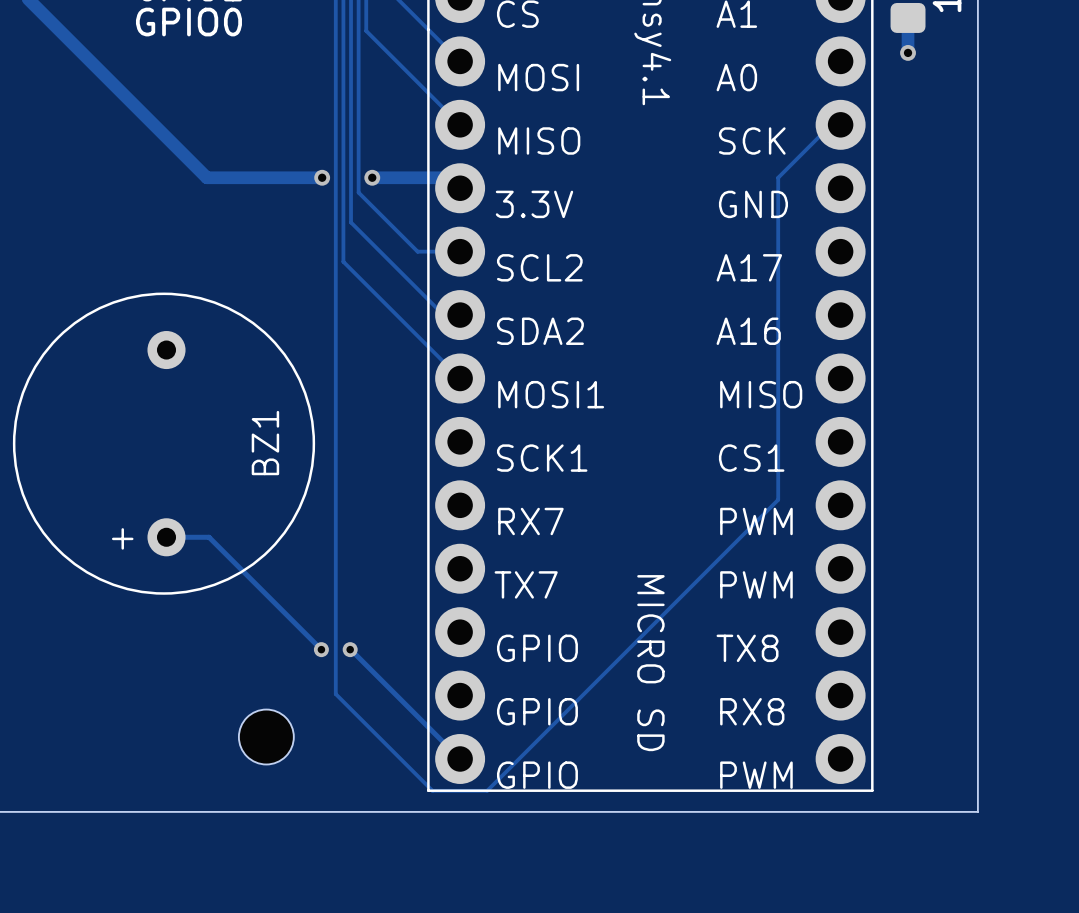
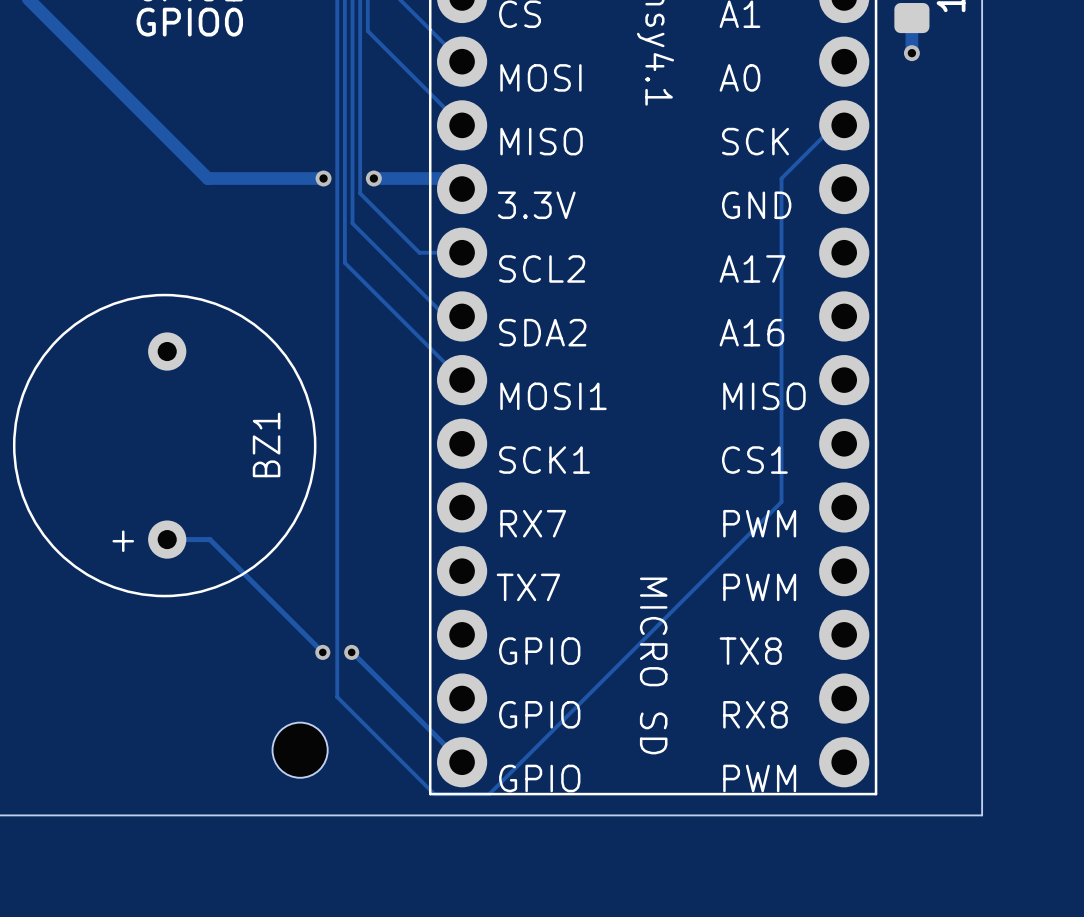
part position: (266, 737) -> (300, 750)

